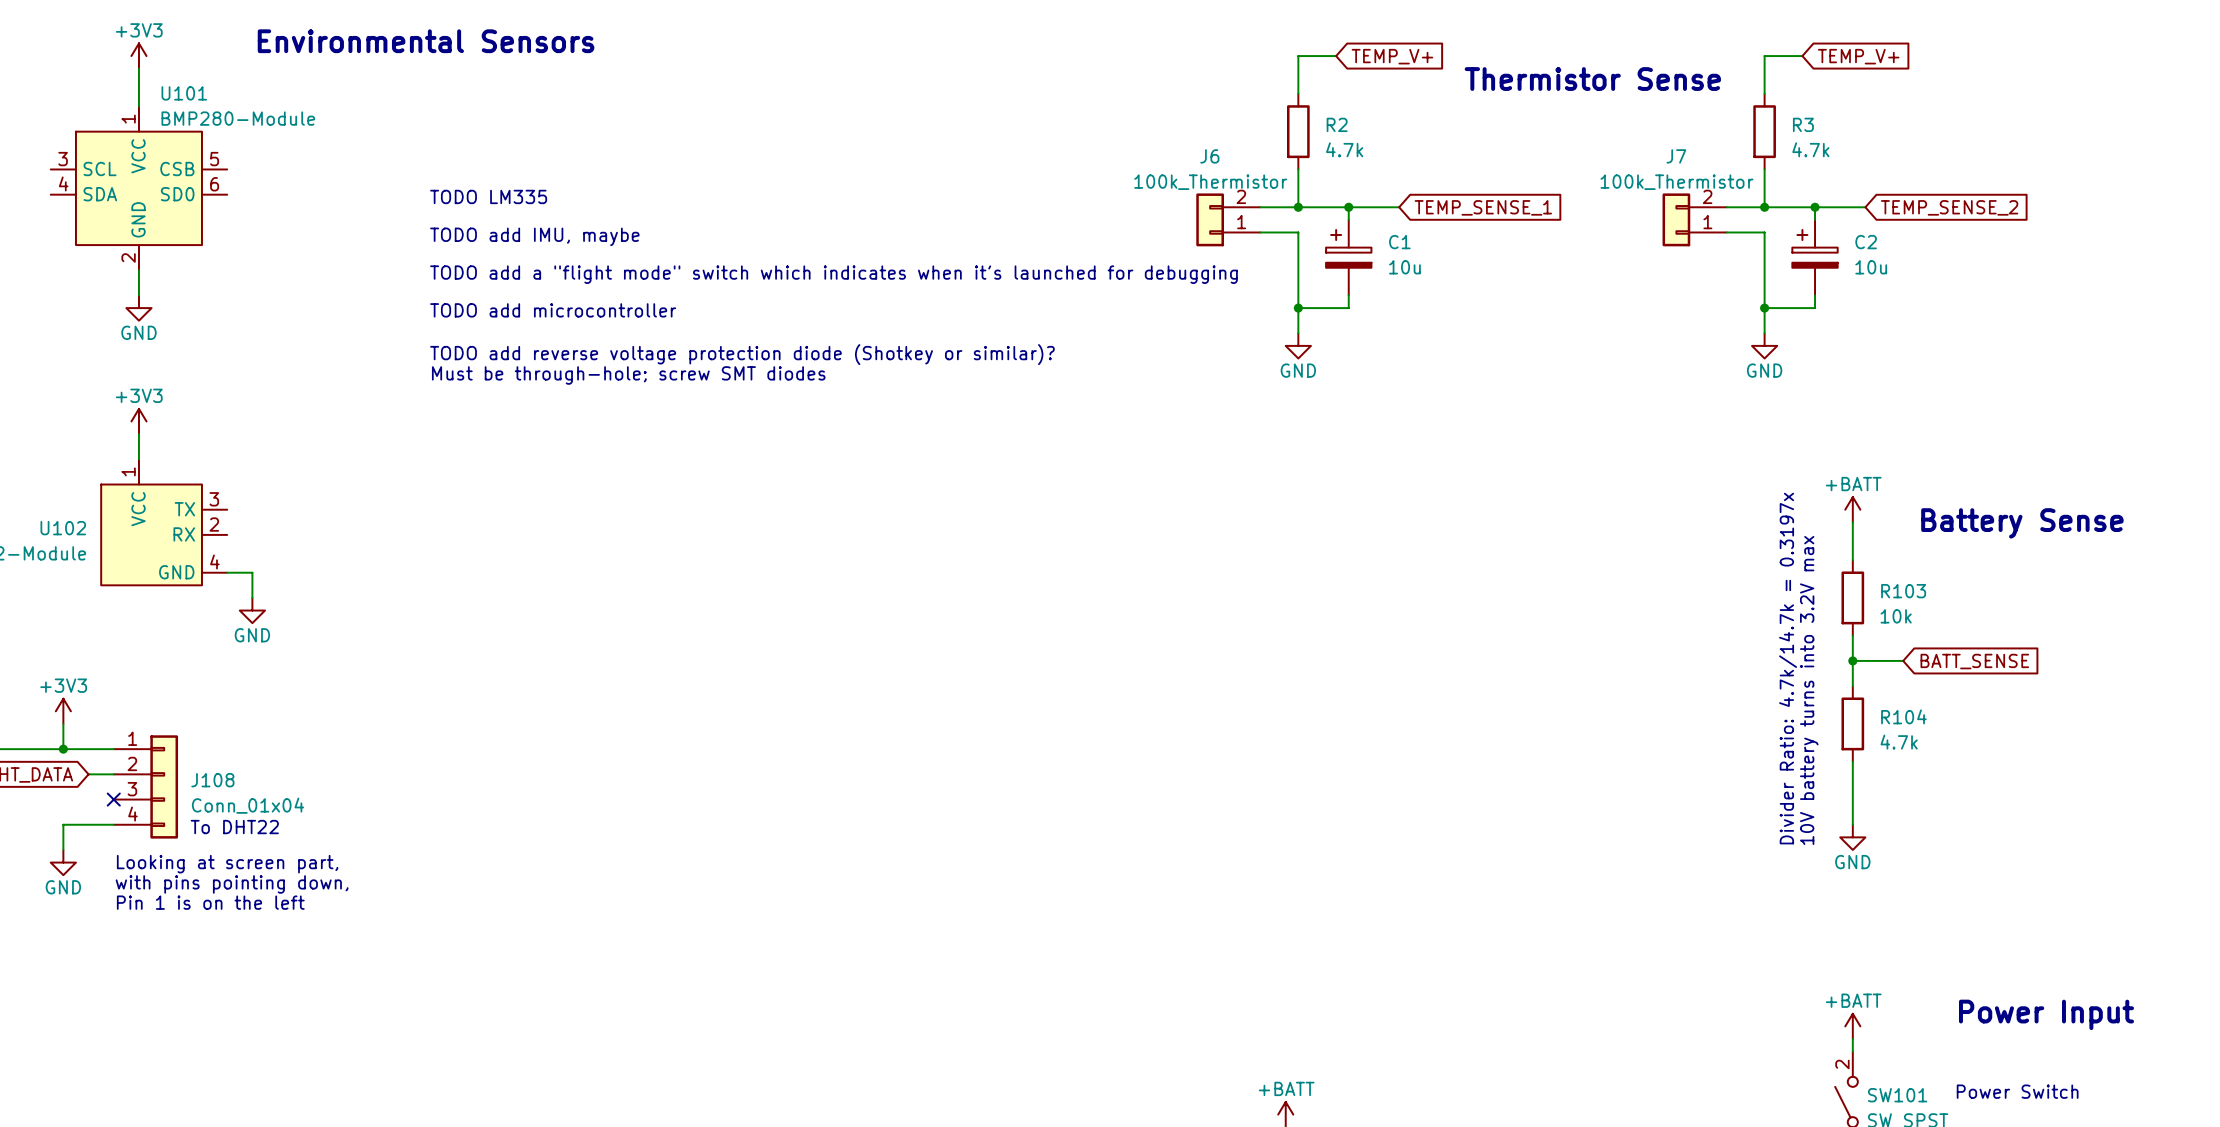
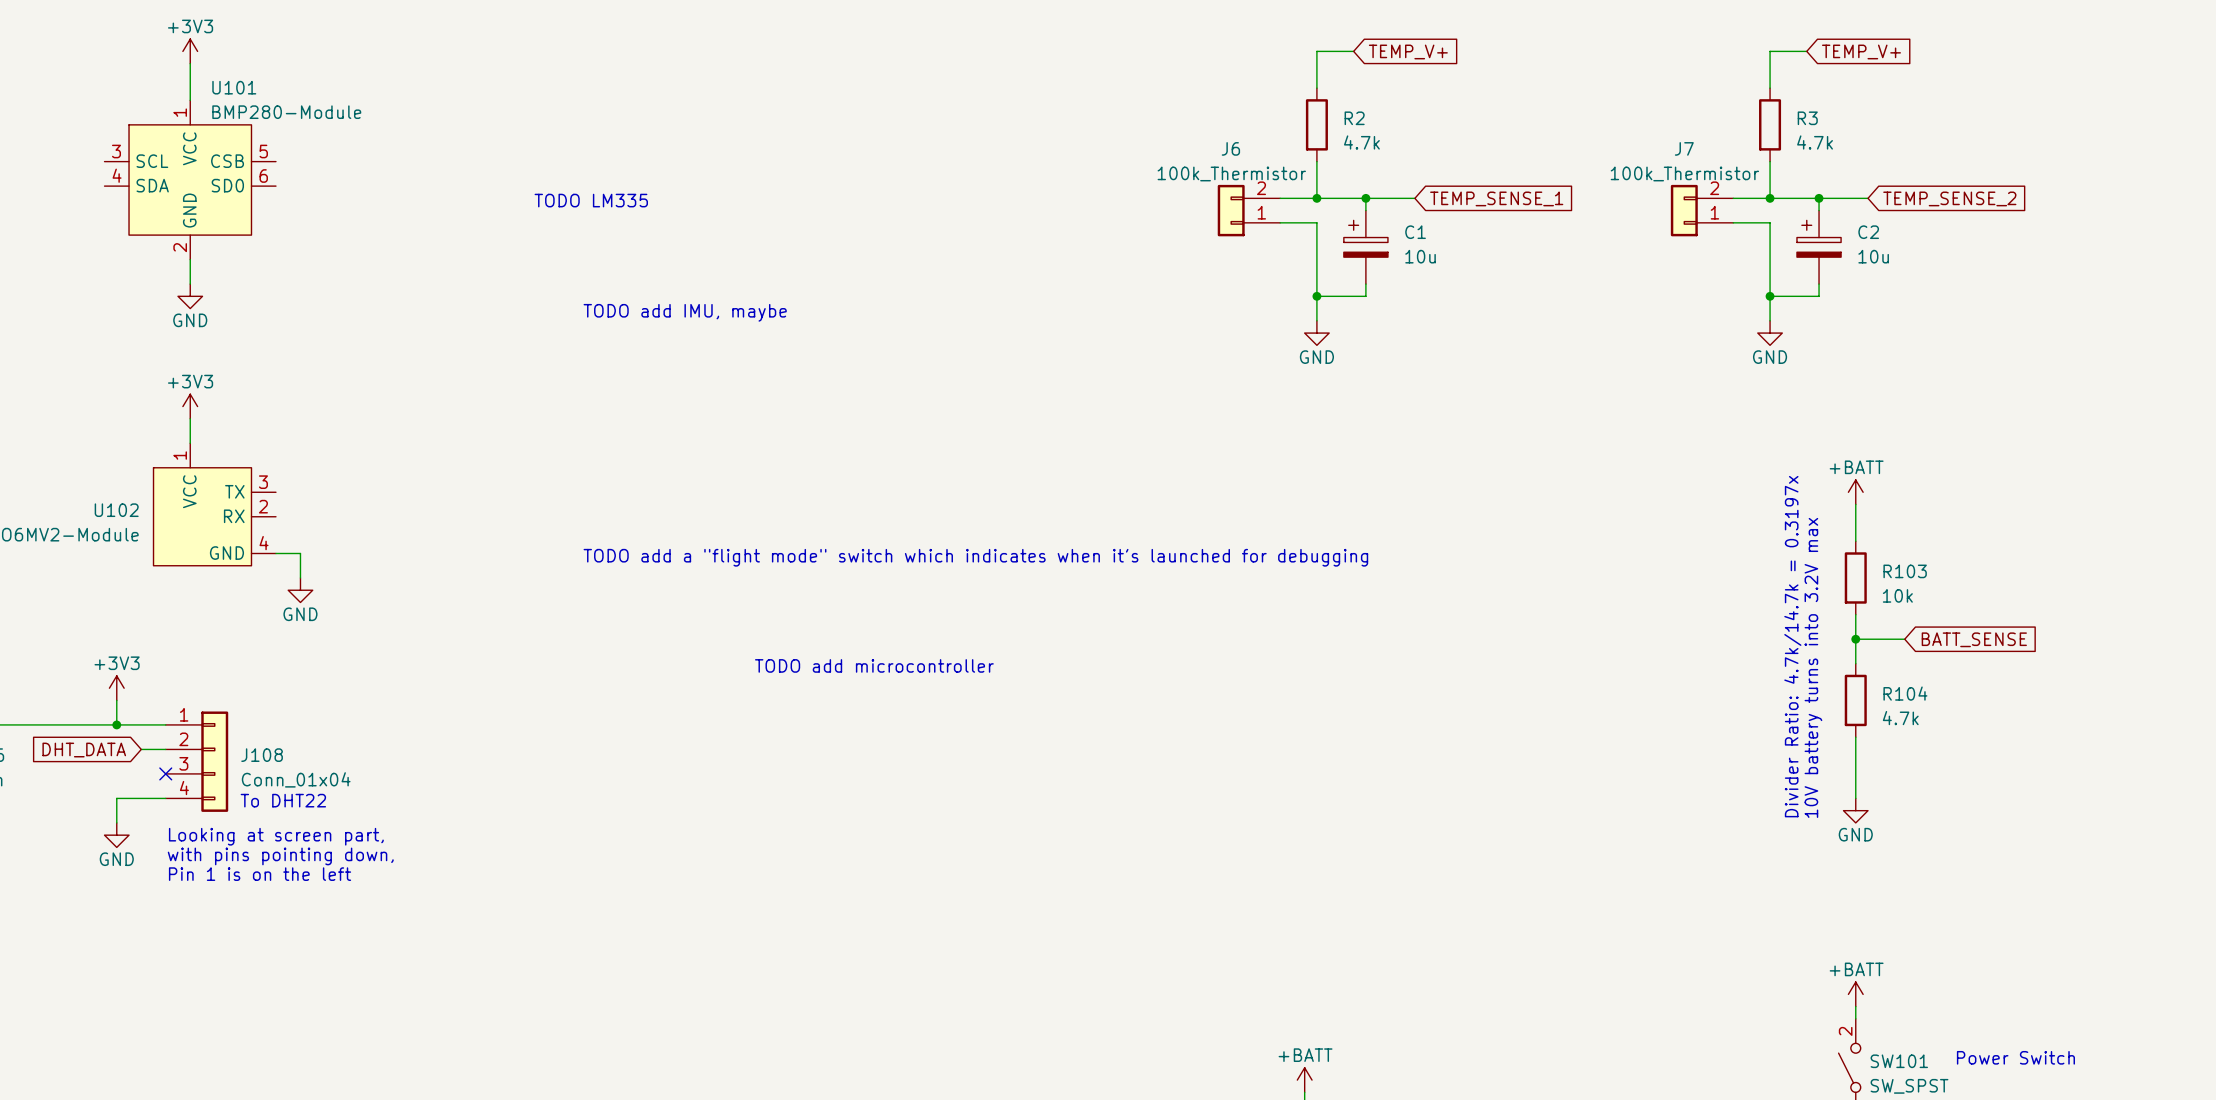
text: Environmental Sensors (426, 41) -> none
text: Thermistor Sense (1592, 79) -> none
text position: TODO LM335 (488, 196) -> TODO LM335 (591, 200)
text position: TODO add IMU, maybe (534, 236) -> TODO add IMU, maybe (685, 312)
text: TODO add a "flight mode" switch which indicates when it's launched for debugging (833, 274) -> none
text: TODO add microcontroller (553, 310) -> none
text: TODO add reverse voltage protection diode (Shotkey or similar)? (742, 354) -> none
text: Must be through-hole; screw SMT diodes (628, 375) -> none
text: Battery Sense (2022, 523) -> none
text: none -> TODO add a "flight mode" switch which indicates when it's launched for debugging (975, 557)
text: none -> TODO add microcontroller (874, 665)
text: Power Input (2046, 1014) -> none

